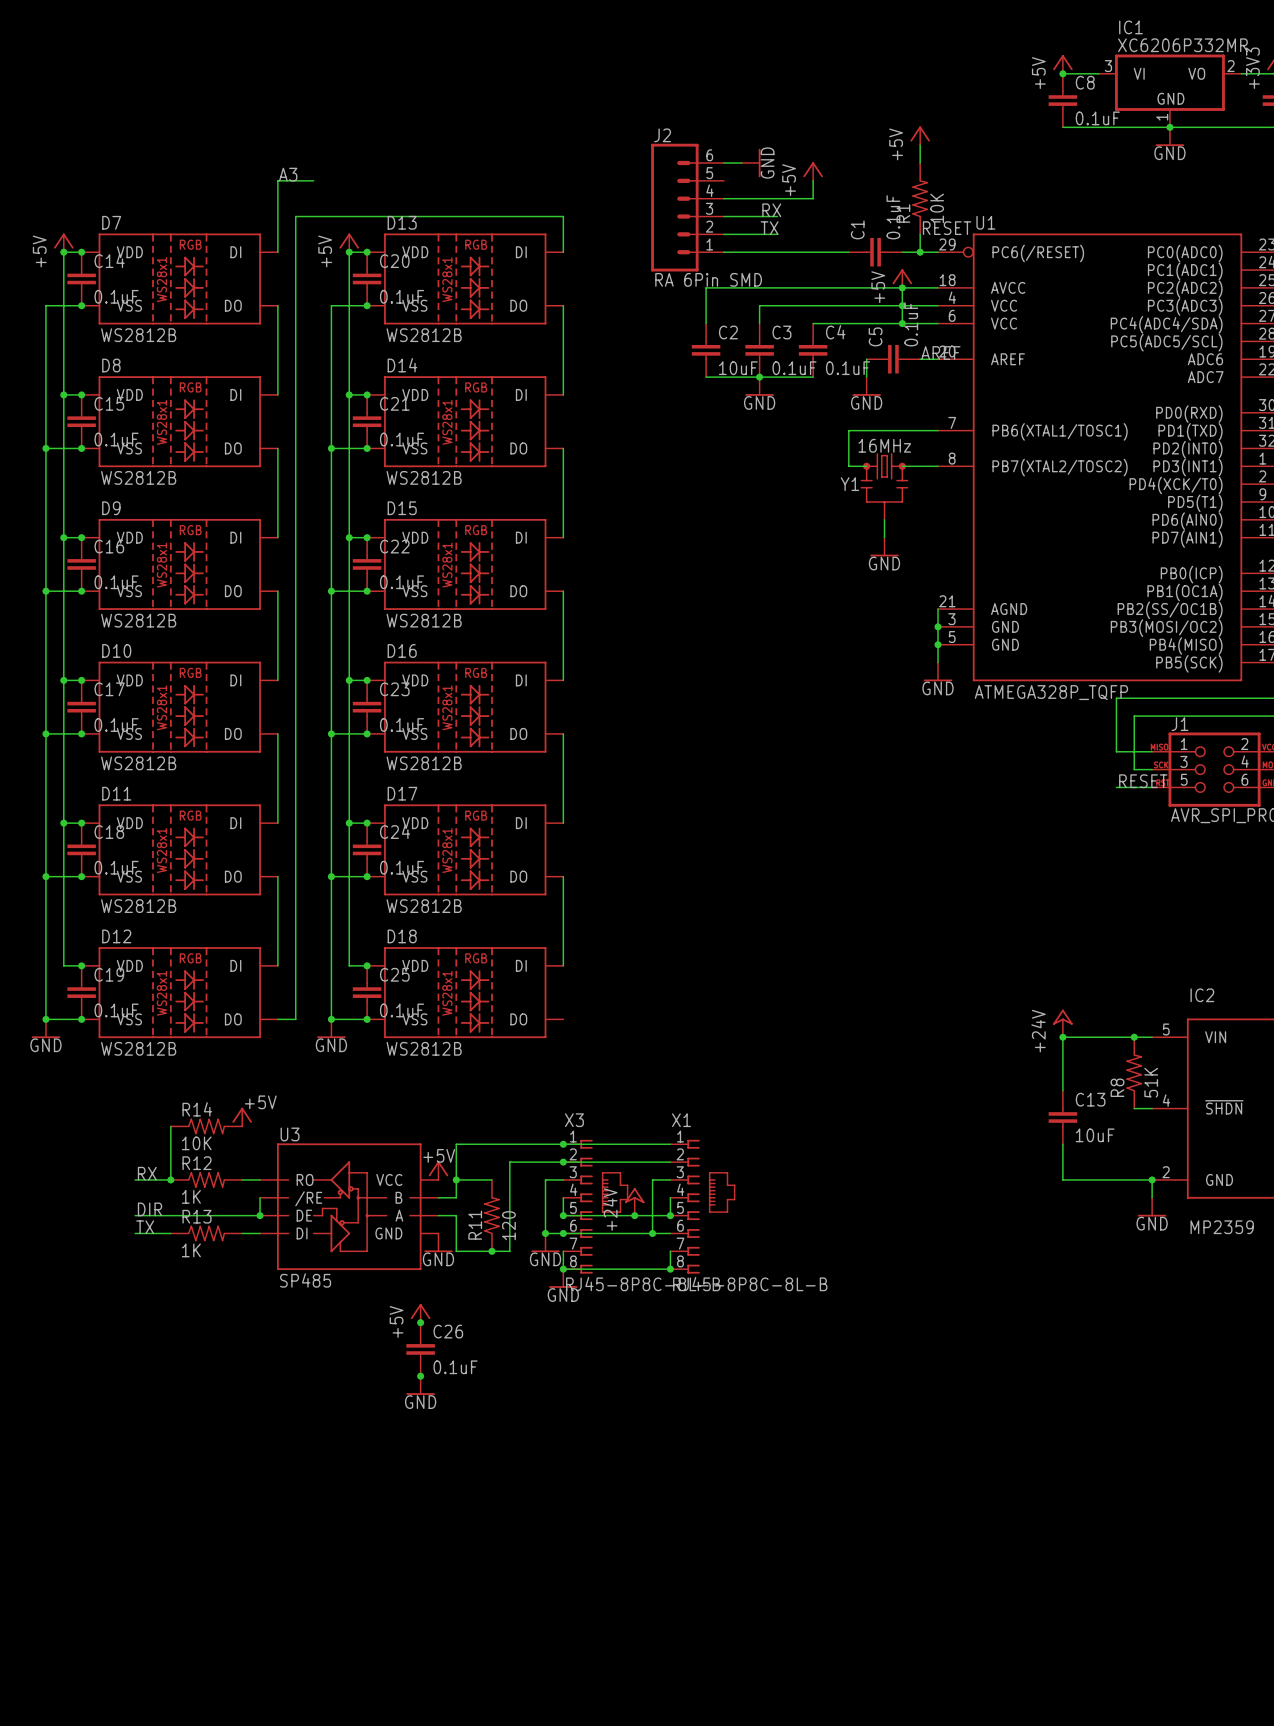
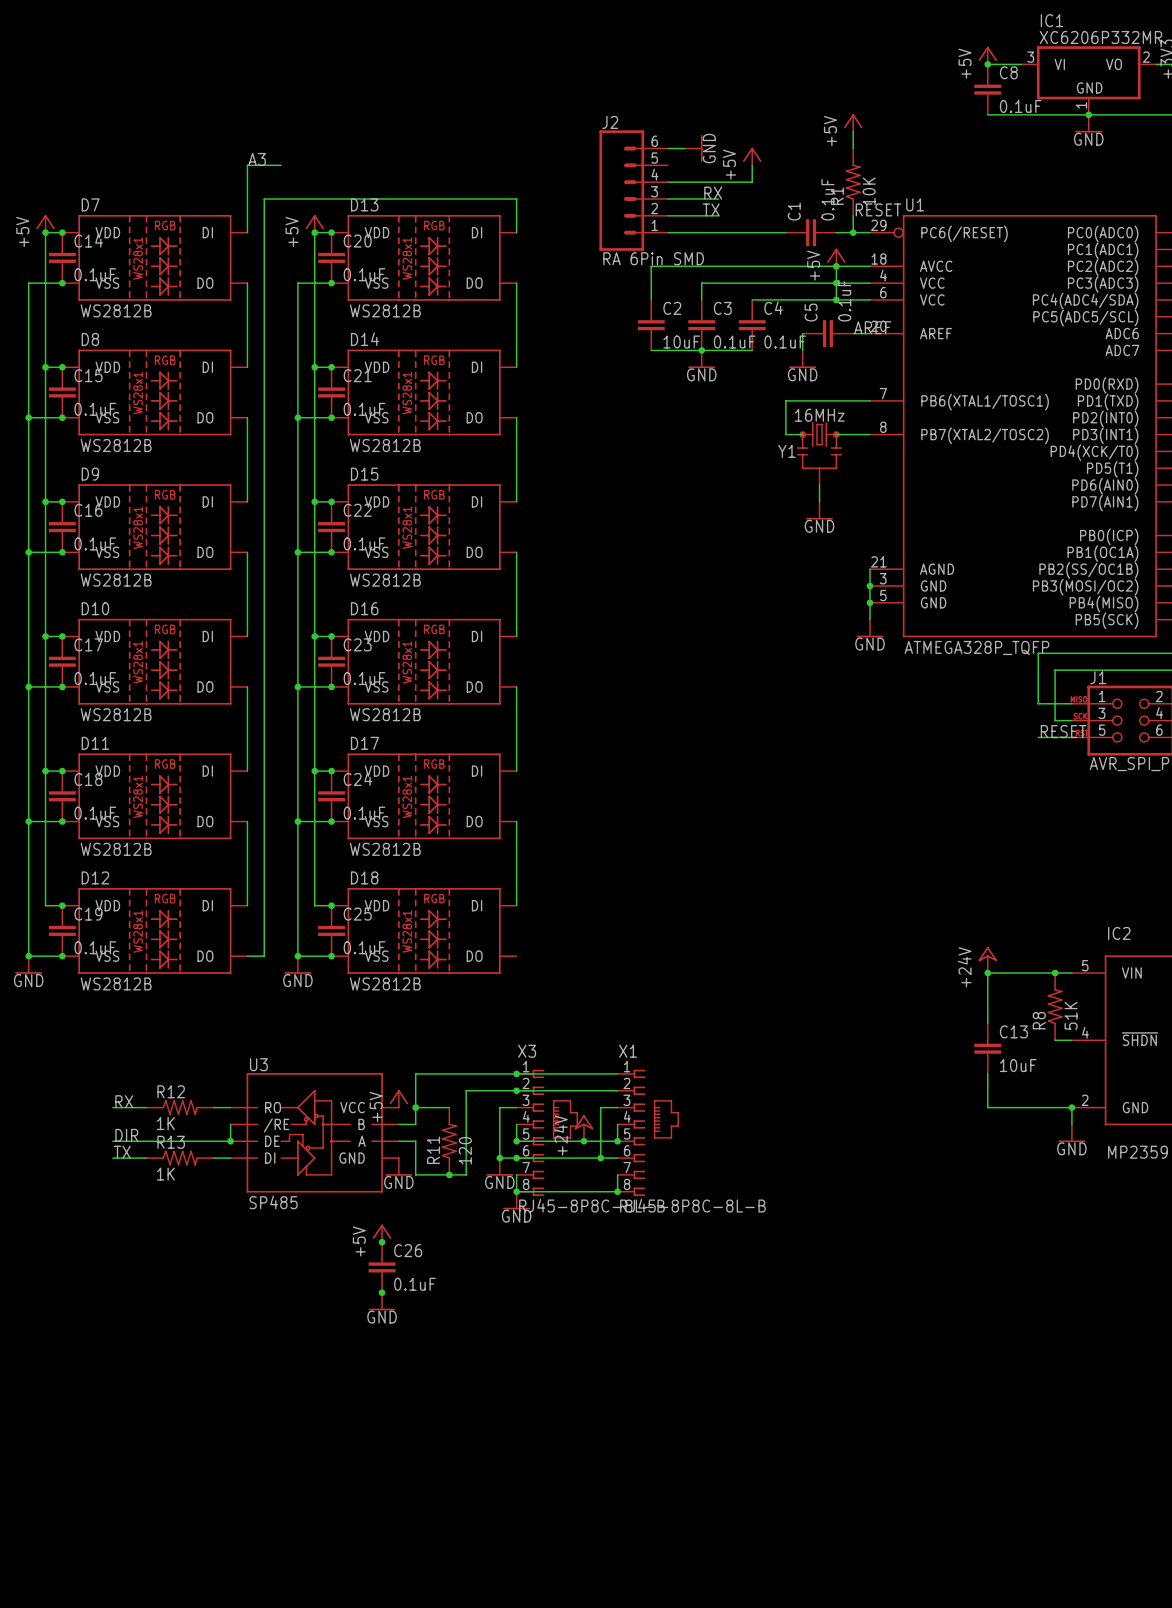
power symbol: +5V (242, 1117) -> none
wire: (170, 1126) (170, 1179) -> none
R14: 10K (206, 1126) -> none
power symbol text rotation: 0° (439, 1155) -> 90° counterclockwise (376, 1106)
junction: (170, 1179) -> none

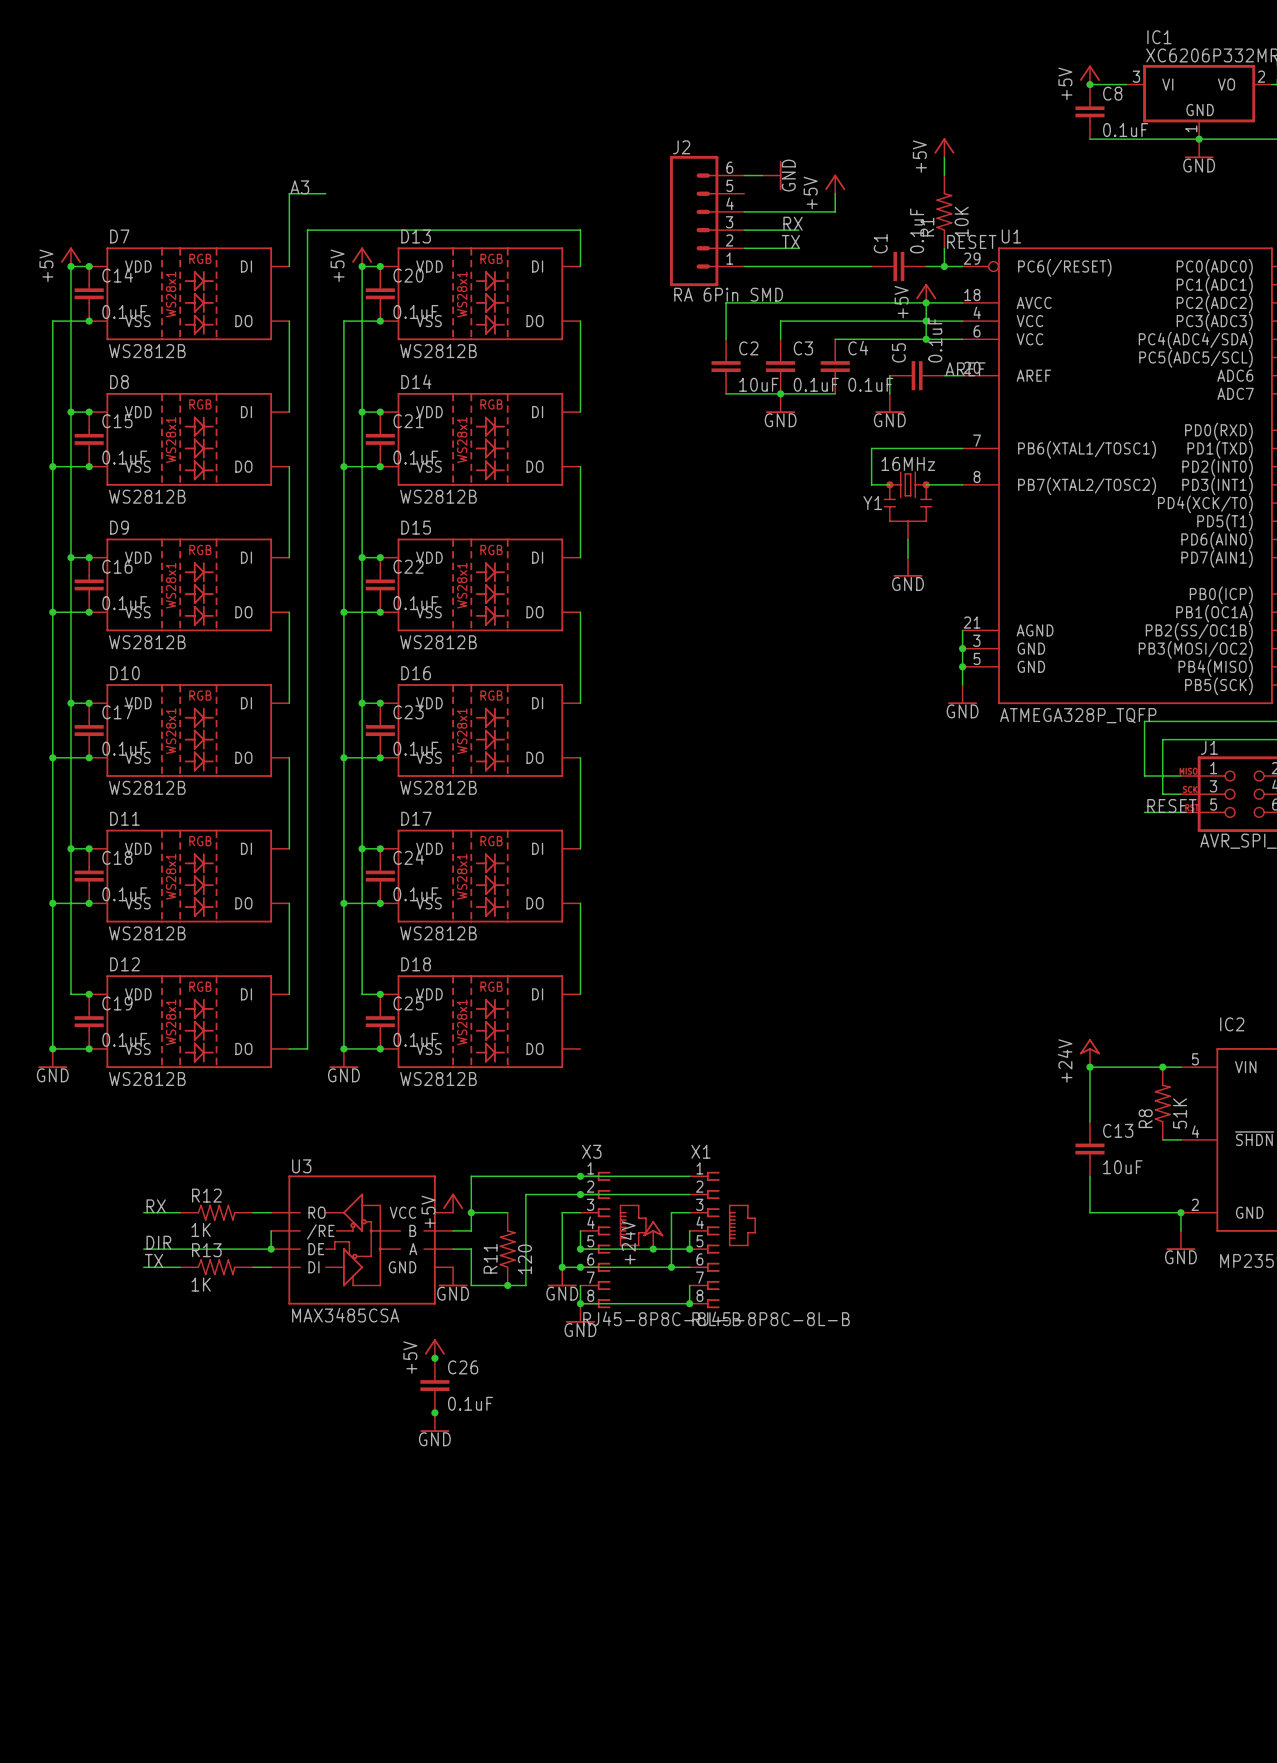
U3 value: SP485 (273, 1202) -> MAX3485CSA (345, 1315)

